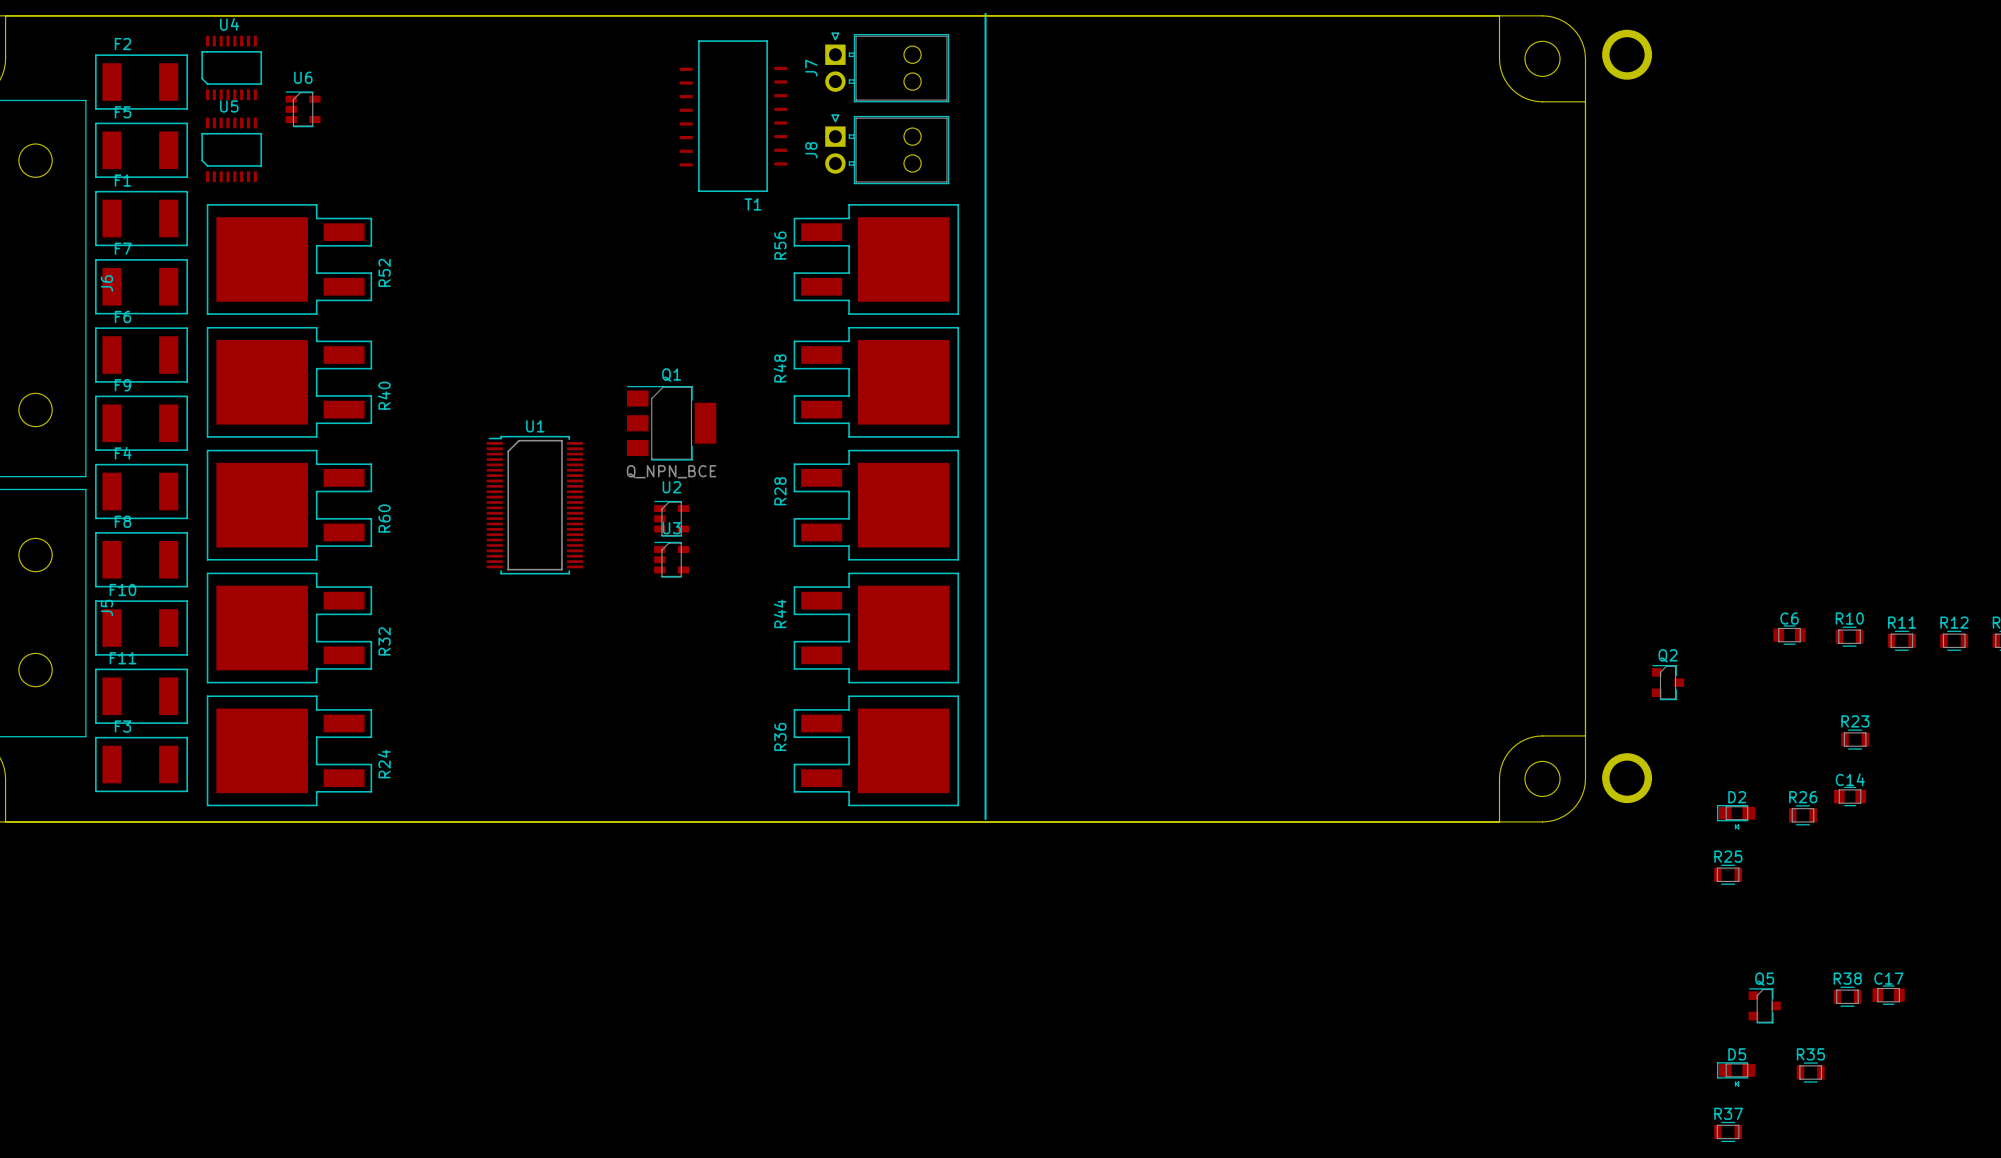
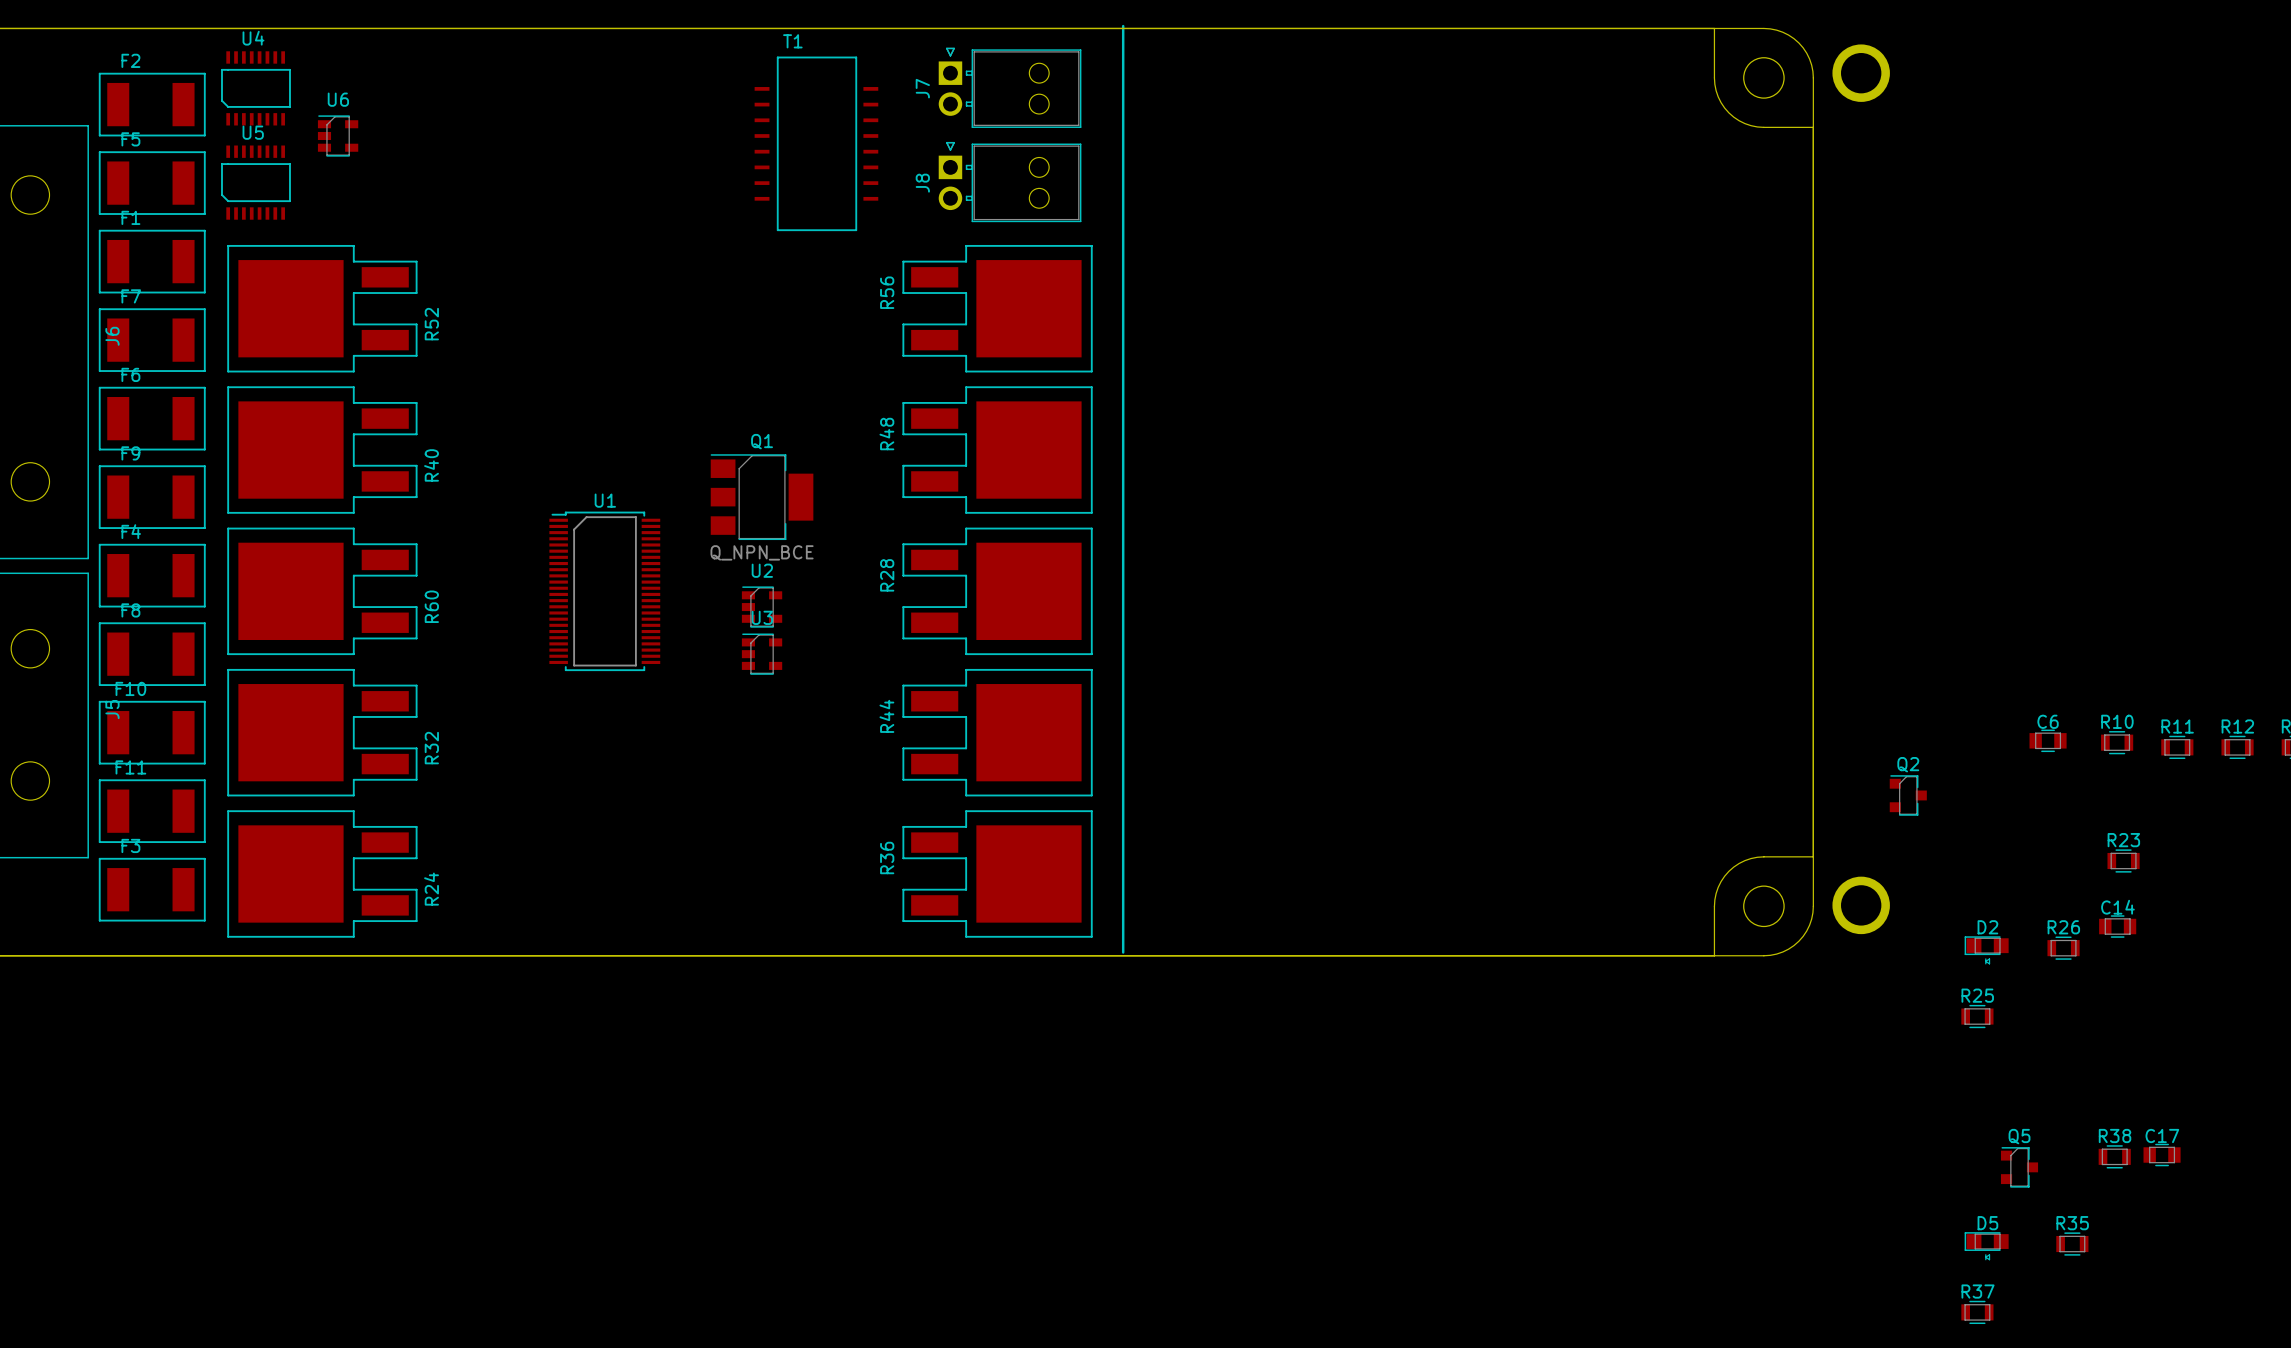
T1 footprint: [679, 40, 788, 193] -> [754, 56, 879, 232]
T1 name position: T1 (752, 204) -> T1 (792, 41)

